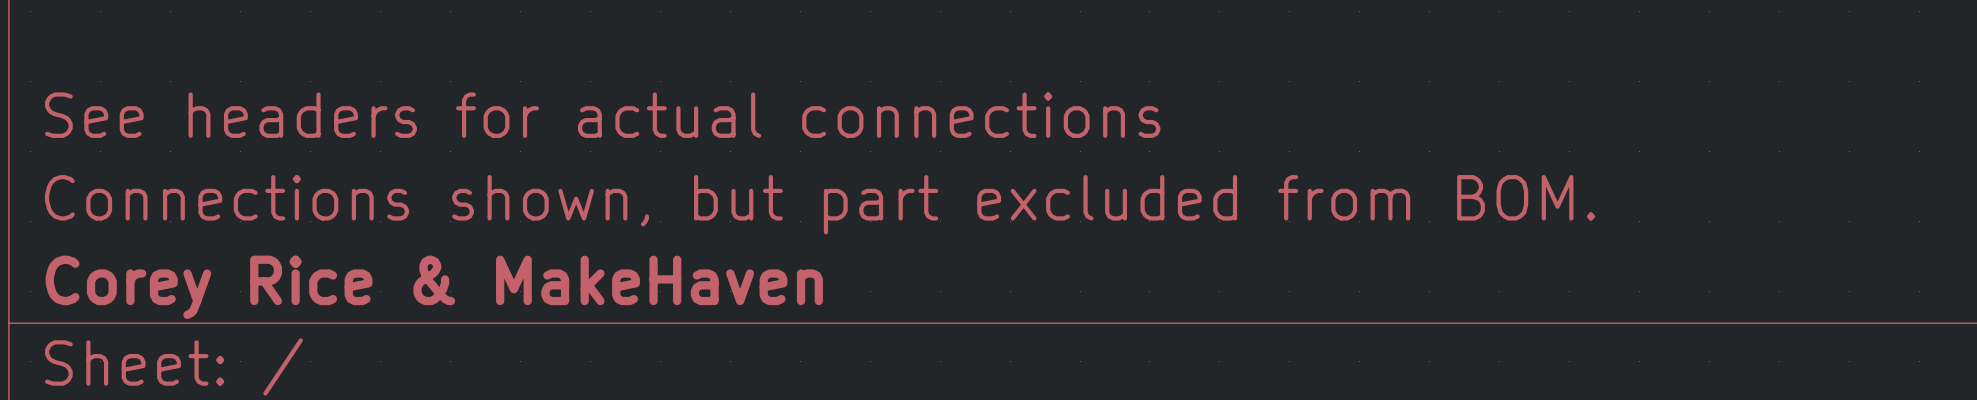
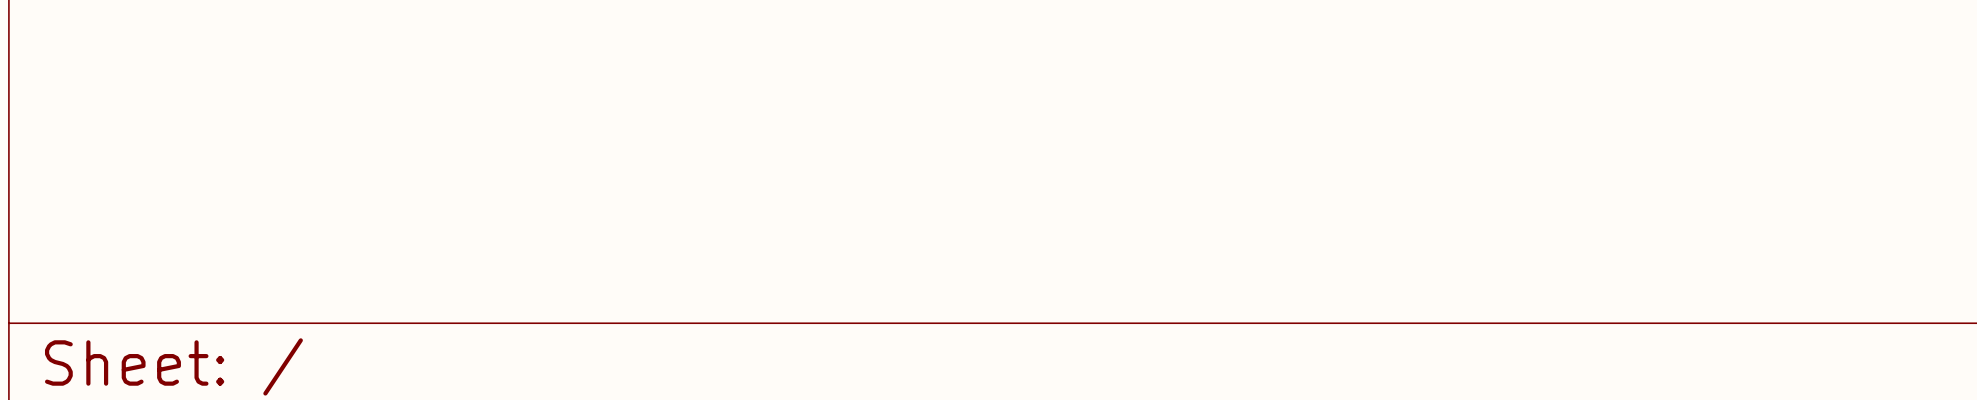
title block: See headers for actual connections (602, 115) -> none
title block: Connections shown, but part excluded from BOM. (820, 204) -> none
title block: Corey Rice & MakeHaven (434, 287) -> none

